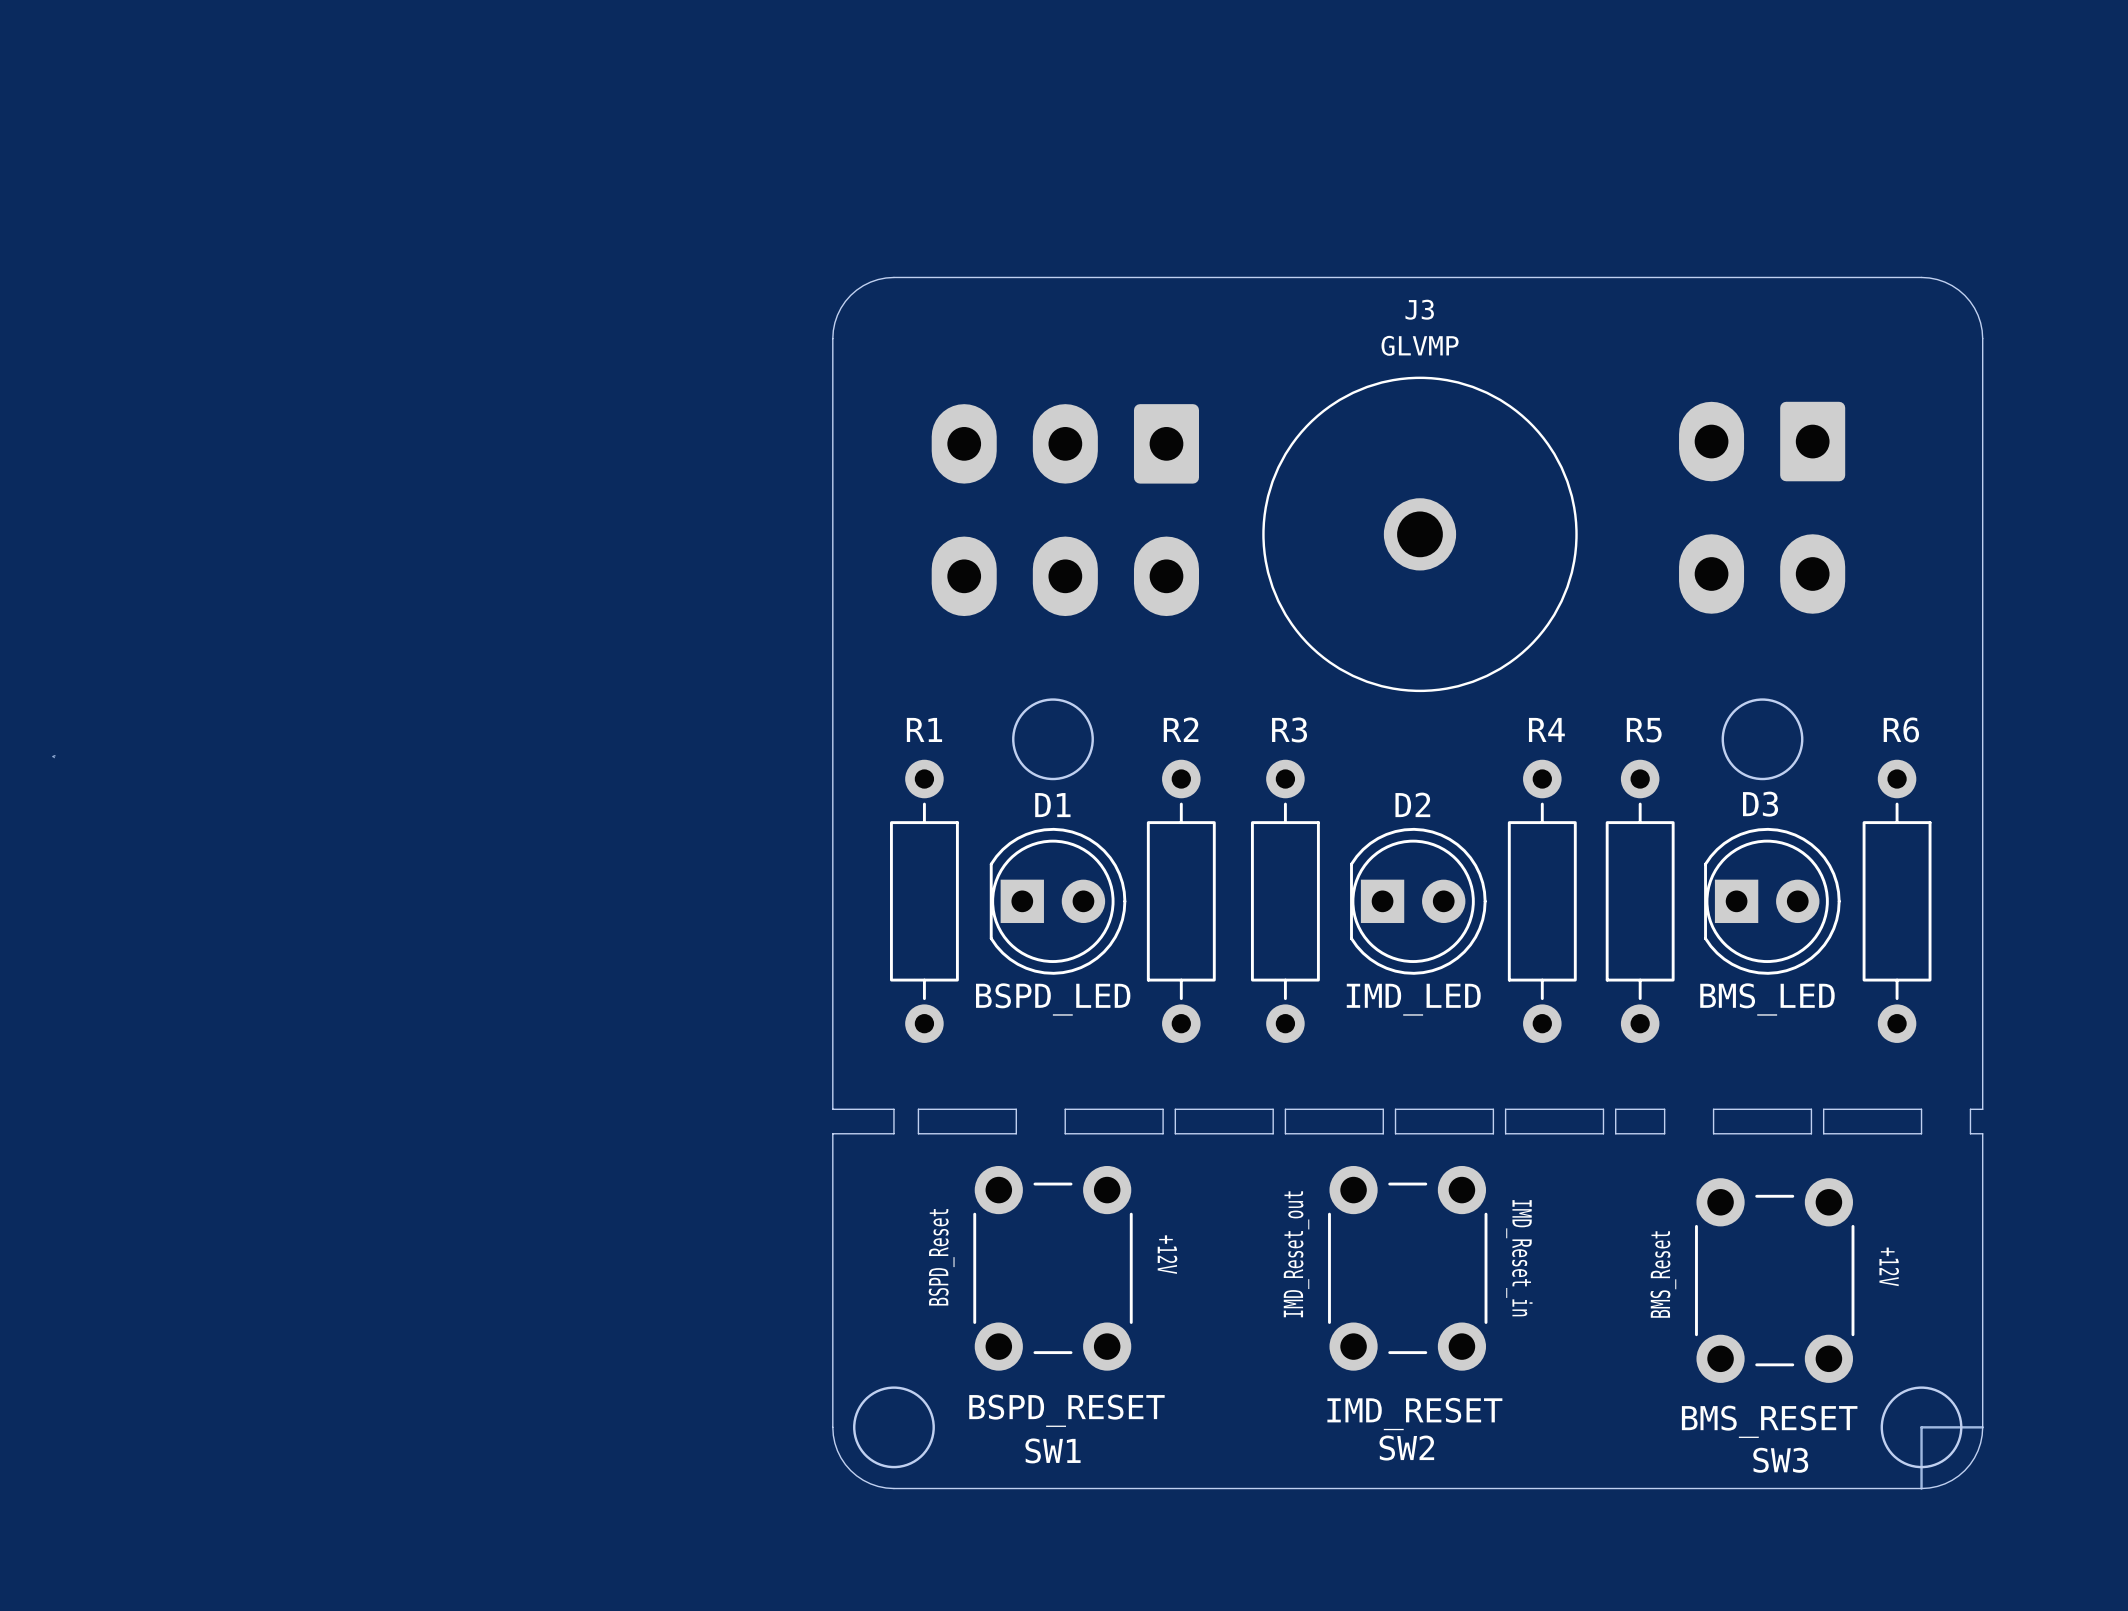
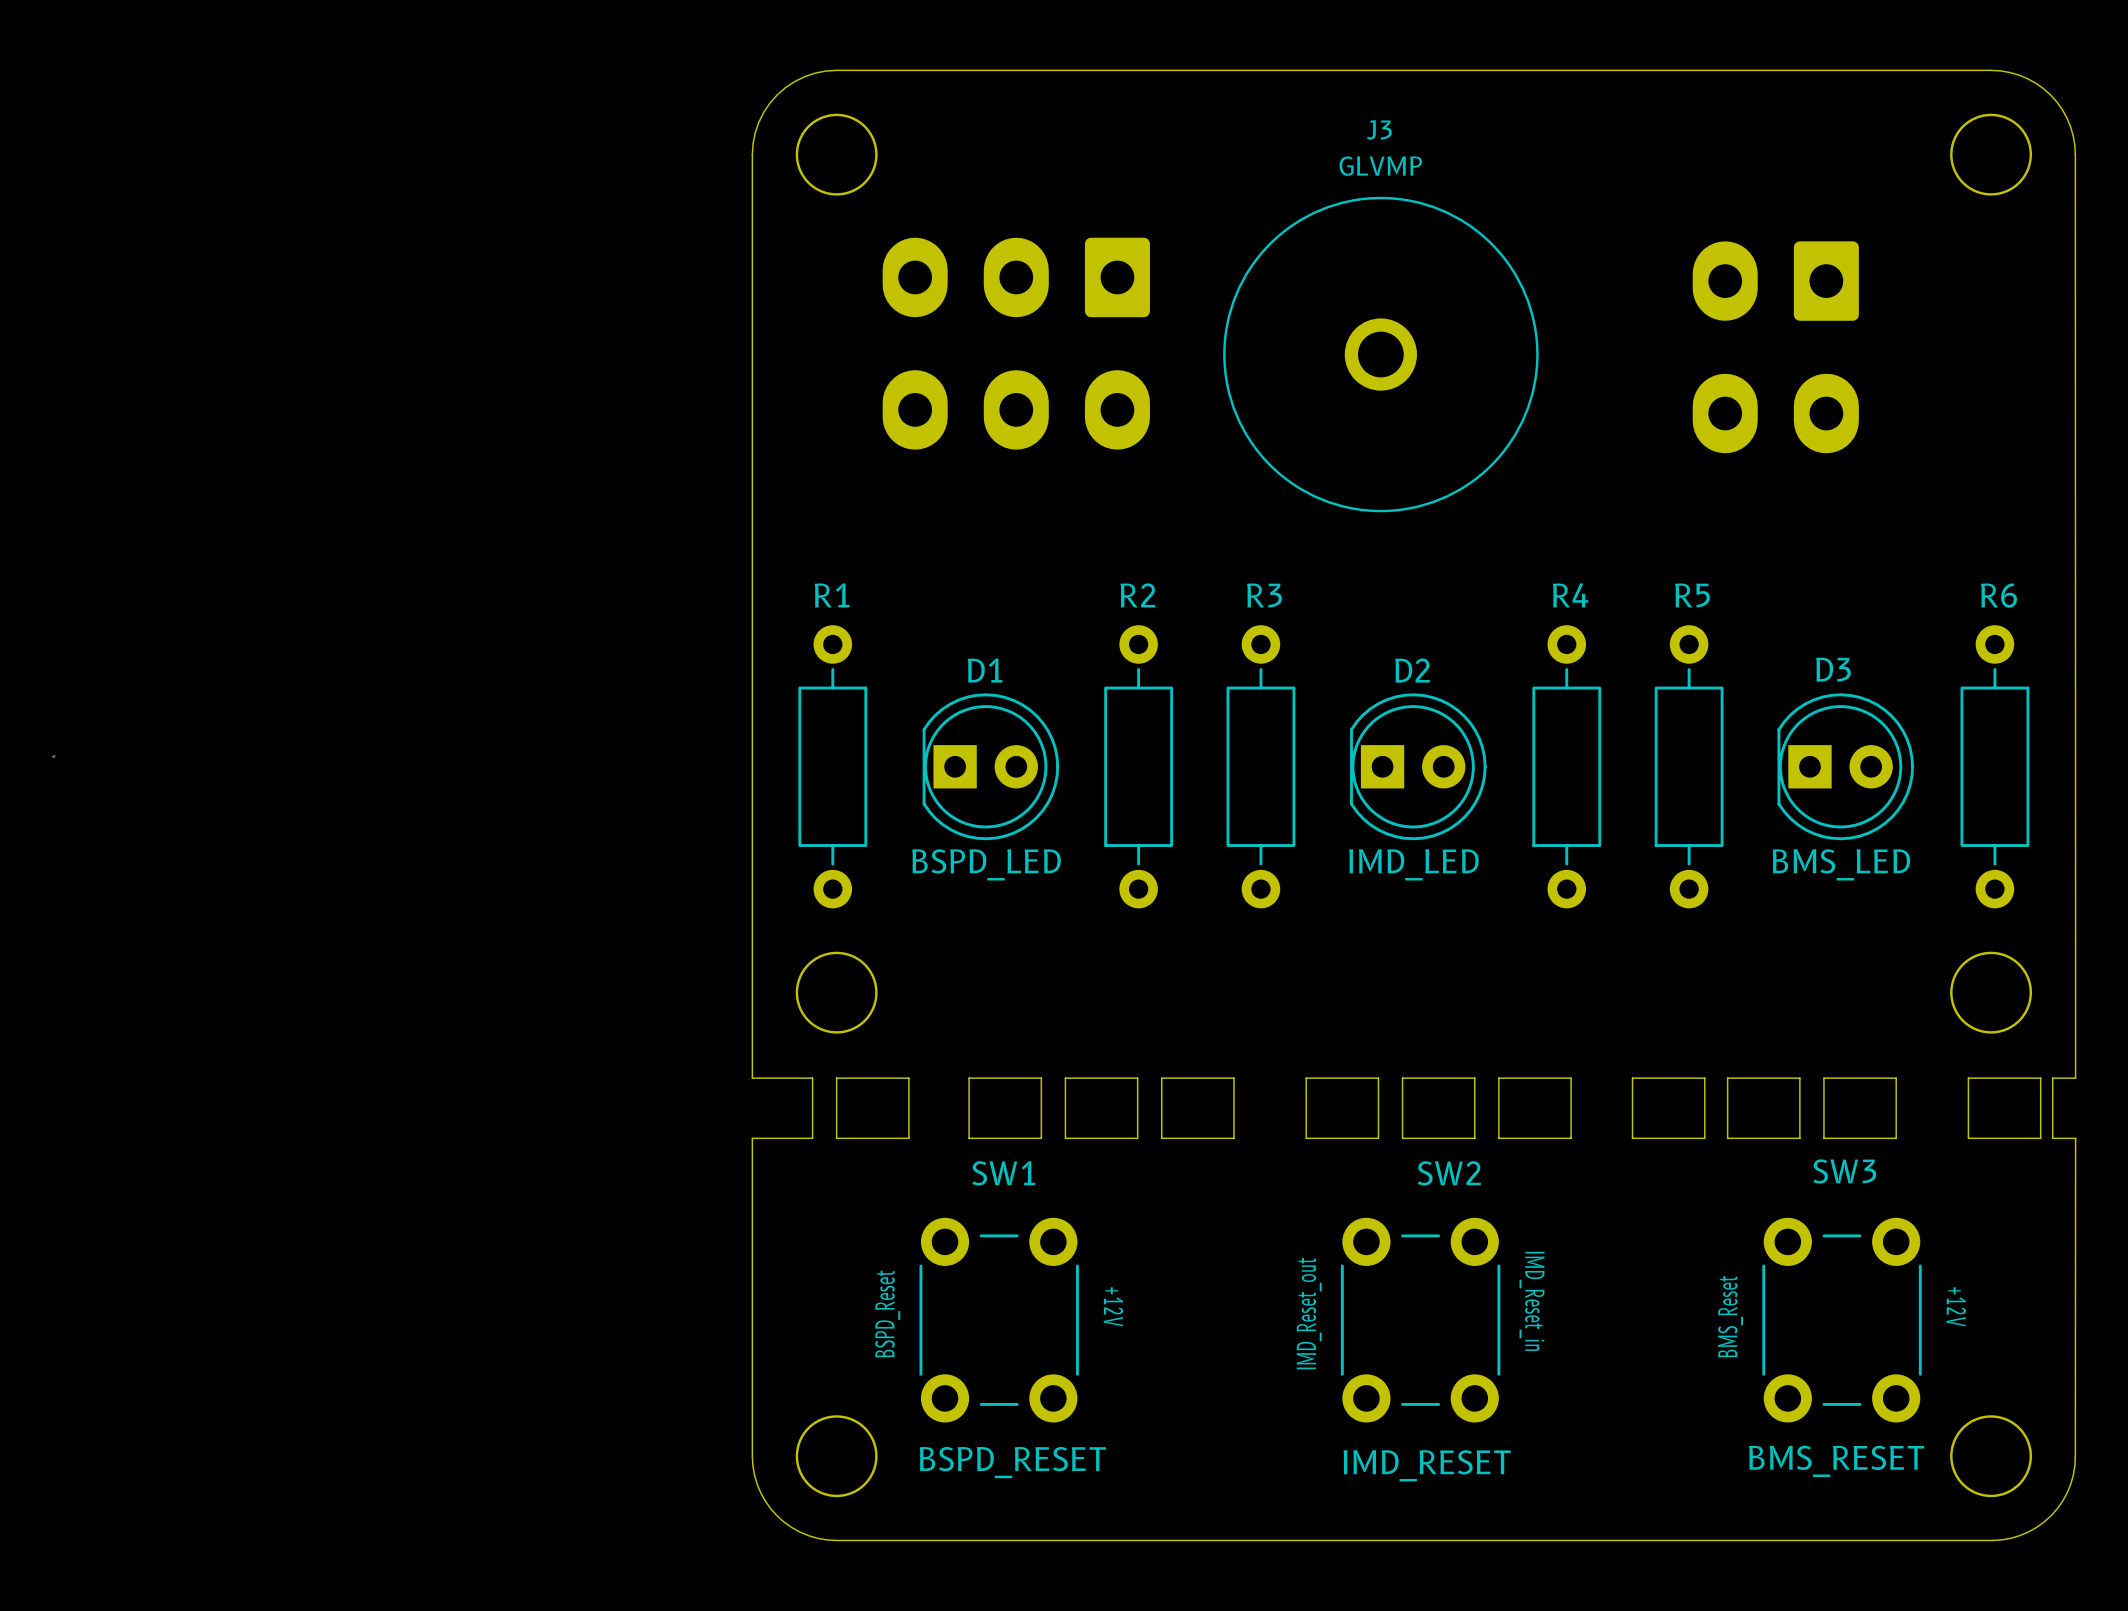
round board edge: none -> [795, 113, 878, 196]
round board edge: none -> [1950, 113, 2033, 196]
board edge: (893, 277) (1921, 277) (1944, 282) (1964, 295) (1978, 315) (1982, 338) (1982, 1109) (1970, 1109) (1970, 1133) (1982, 1133) (1982, 1427) (1978, 1450) (1964, 1470) (1944, 1483) (1921, 1488) (893, 1488) (870, 1483) (850, 1470) (837, 1450) (832, 1427) (832, 1133) (893, 1133) (893, 1109) (832, 1109) (832, 338) (837, 315) (850, 295) (870, 282) (893, 277) -> (1992, 1540) (2001, 1539) (2019, 1535) (2036, 1527) (2051, 1515) (2062, 1500) (2070, 1483) (2075, 1456) (2075, 1138) (2052, 1138) (2052, 1078) (2075, 1078) (2075, 154) (2070, 126) (2056, 102) (2043, 88) (2027, 78) (2009, 72) (1991, 70) (836, 70) (804, 76) (785, 87) (769, 103) (758, 122) (752, 154) (752, 1078) (812, 1078) (812, 1138) (752, 1138) (752, 1456) (757, 1484) (770, 1508) (784, 1522) (800, 1532) (817, 1538) (836, 1540) (1992, 1540)
part position: (1762, 507) -> (1775, 347)
part position: (1065, 510) -> (1016, 343)
J3 position: (1419, 534) -> (1380, 354)
round board edge: [1012, 698, 1094, 781] -> none
round board edge: [1721, 698, 1804, 781] -> none
R1 position: (924, 901) -> (832, 766)
D1 position: (1058, 901) -> (990, 766)
R2 position: (1181, 901) -> (1138, 766)
R3 position: (1285, 901) -> (1260, 766)
D2 position: (1418, 901) -> (1418, 766)
R4 position: (1542, 901) -> (1566, 766)
R5 position: (1640, 901) -> (1689, 766)
D3 position: (1772, 901) -> (1845, 766)
R6 position: (1897, 901) -> (1994, 766)
round board edge: none -> [795, 951, 878, 1034]
round board edge: none -> [1950, 951, 2033, 1034]
board edge: none -> (836, 1078) (908, 1078) (908, 1138) (836, 1138) (836, 1078)
board edge: none -> (969, 1078) (1041, 1078) (1041, 1138) (969, 1138) (969, 1078)
board edge: none -> (1065, 1078) (1137, 1078) (1137, 1138) (1065, 1138) (1065, 1078)
board edge: none -> (1161, 1078) (1233, 1078) (1233, 1138) (1161, 1138) (1161, 1078)
board edge: none -> (1306, 1078) (1378, 1078) (1378, 1138) (1306, 1138) (1306, 1078)
board edge: none -> (1402, 1078) (1474, 1078) (1474, 1138) (1402, 1138) (1402, 1078)
board edge: none -> (1498, 1078) (1571, 1078) (1571, 1138) (1498, 1138) (1498, 1078)
board edge: none -> (1632, 1078) (1704, 1078) (1704, 1138) (1632, 1138) (1632, 1078)
board edge: none -> (1727, 1078) (1799, 1078) (1799, 1138) (1727, 1138) (1727, 1078)
board edge: none -> (1823, 1078) (1896, 1078) (1896, 1138) (1823, 1138) (1823, 1078)
board edge: none -> (1968, 1078) (2040, 1078) (2040, 1138) (1968, 1138) (1968, 1078)
board edge: (918, 1109) (1016, 1109) (1016, 1133) (918, 1133) (918, 1109) -> none
board edge: (1065, 1109) (1163, 1109) (1163, 1133) (1065, 1133) (1065, 1109) -> none
board edge: (1175, 1109) (1273, 1109) (1273, 1133) (1175, 1133) (1175, 1109) -> none
board edge: (1285, 1109) (1383, 1109) (1383, 1133) (1285, 1133) (1285, 1109) -> none
board edge: (1395, 1109) (1493, 1109) (1493, 1133) (1395, 1133) (1395, 1109) -> none
board edge: (1505, 1109) (1603, 1109) (1603, 1133) (1505, 1133) (1505, 1109) -> none
board edge: (1615, 1109) (1664, 1109) (1664, 1133) (1615, 1133) (1615, 1109) -> none
board edge: (1713, 1109) (1811, 1109) (1811, 1133) (1713, 1133) (1713, 1109) -> none
board edge: (1823, 1109) (1921, 1109) (1921, 1133) (1823, 1133) (1823, 1109) -> none
text position: +12V (1167, 1254) -> +12V (1113, 1306)
text position: IMD_Reset_out (1296, 1254) -> IMD_Reset_out (1309, 1313)
text position: BSPD_Reset (941, 1257) -> BSPD_Reset (887, 1313)
text position: IMD_Reset_in (1519, 1258) -> IMD_Reset_in (1532, 1301)
text position: +12V (1889, 1266) -> +12V (1956, 1306)
SW1 position: (1052, 1268) -> (999, 1320)
SW2 position: (1407, 1268) -> (1420, 1320)
text position: BMS_Reset (1663, 1274) -> BMS_Reset (1730, 1316)
SW3 position: (1774, 1280) -> (1842, 1320)
round board edge position: (893, 1427) -> (836, 1456)
round board edge position: (1921, 1427) -> (1991, 1456)
line: (1982, 1427) (1921, 1427) (1921, 1488) -> none
SW2 name position: SW2 (1406, 1448) -> SW2 (1449, 1173)
SW1 name position: SW1 (1052, 1450) -> SW1 (1003, 1173)
SW3 name position: SW3 (1780, 1460) -> SW3 (1844, 1171)

